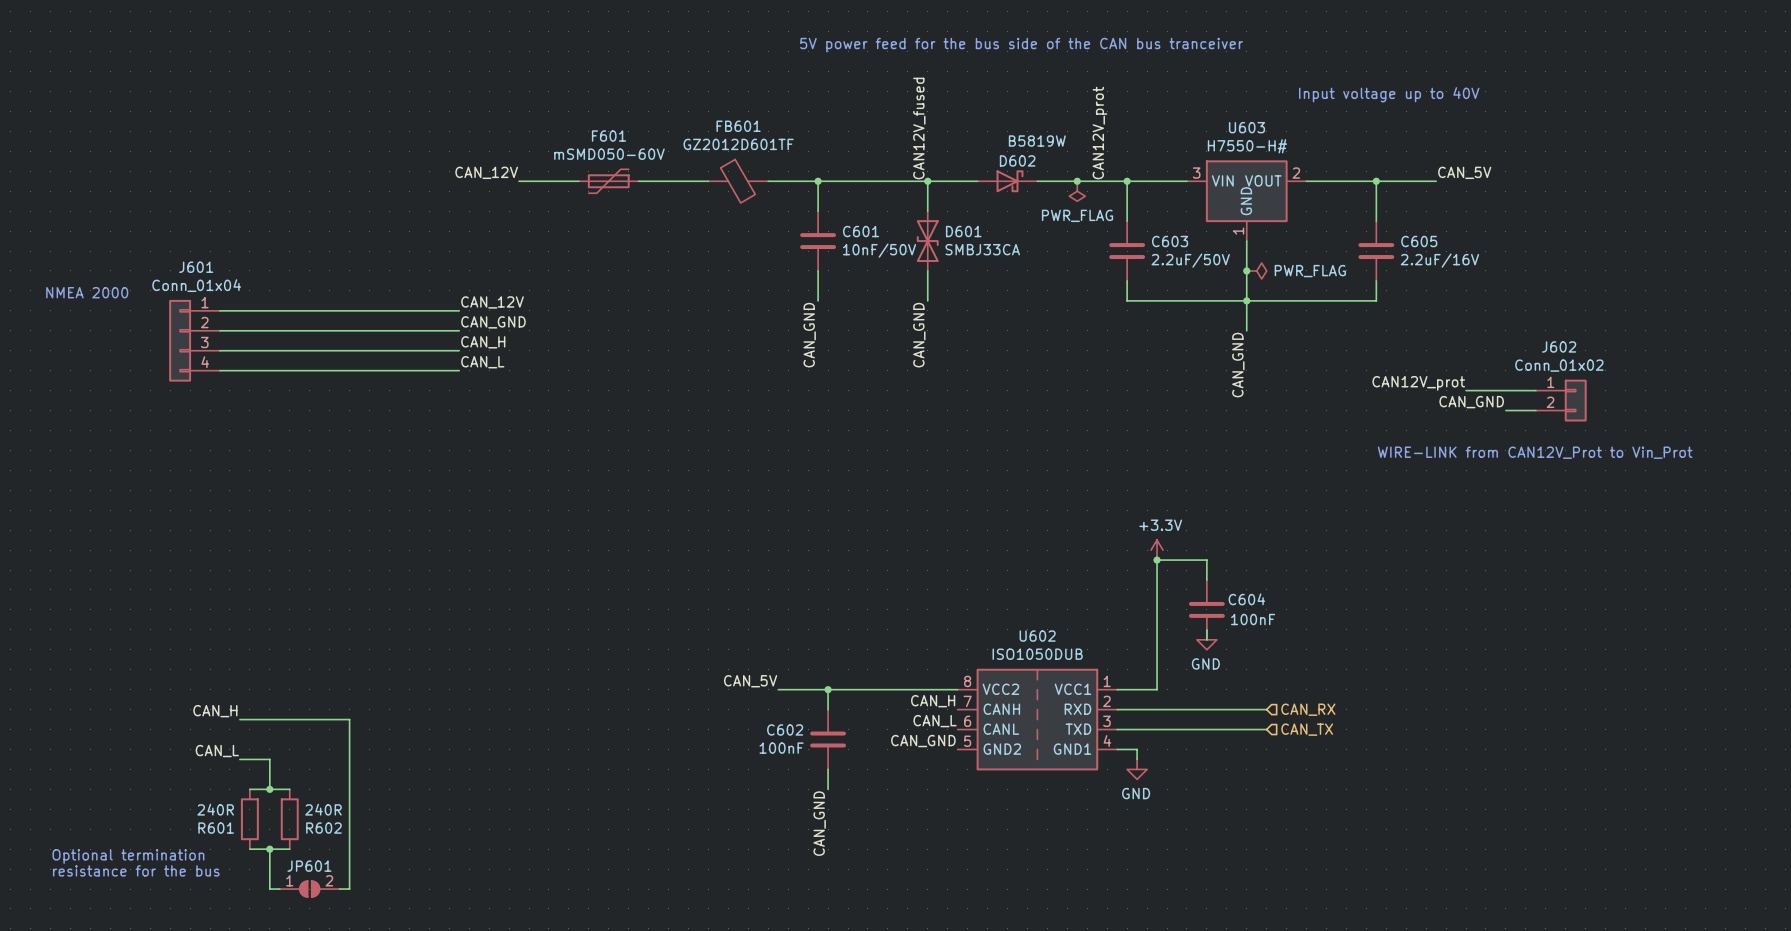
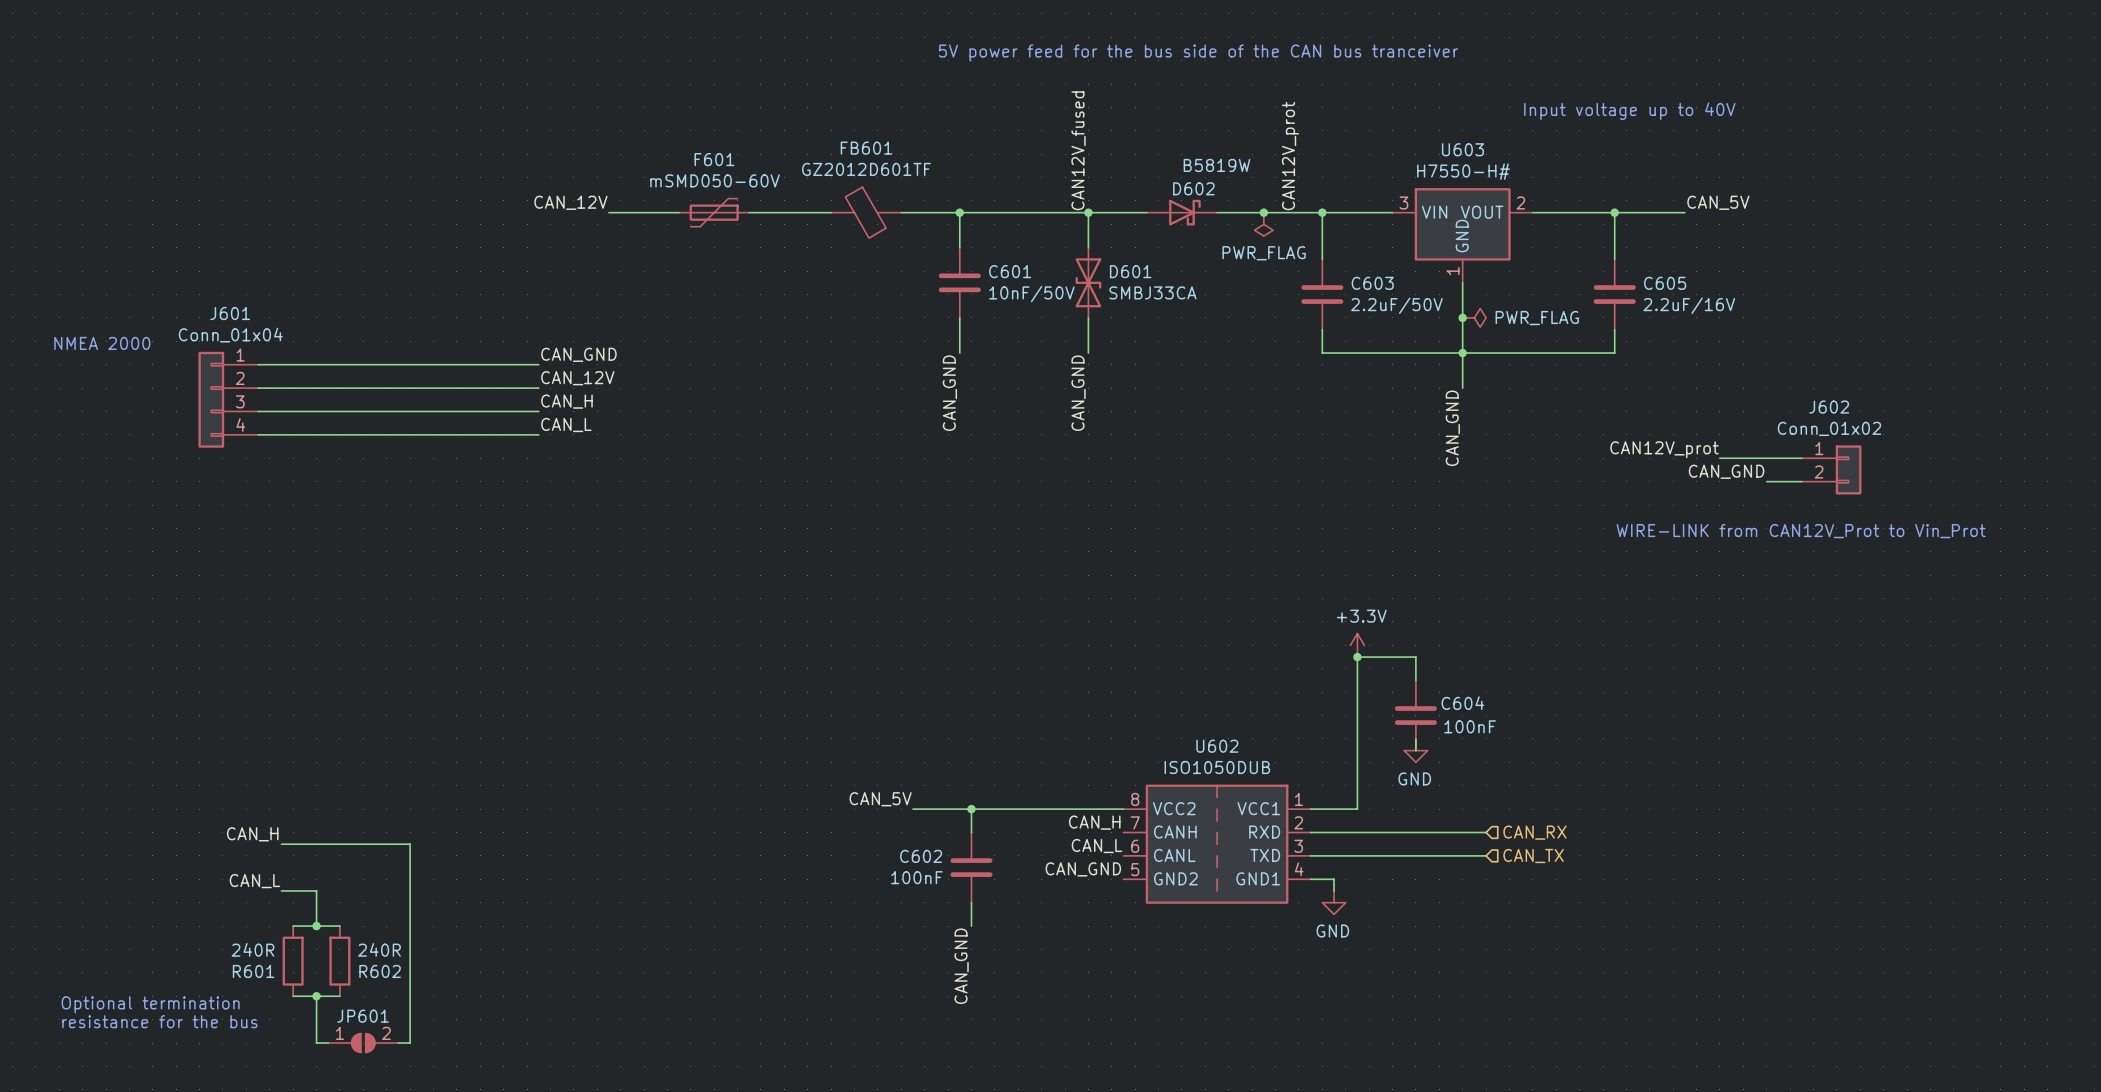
label: CAN_12V (492, 302) -> CAN_GND (578, 354)
label: CAN_GND (493, 322) -> CAN_12V (577, 378)

